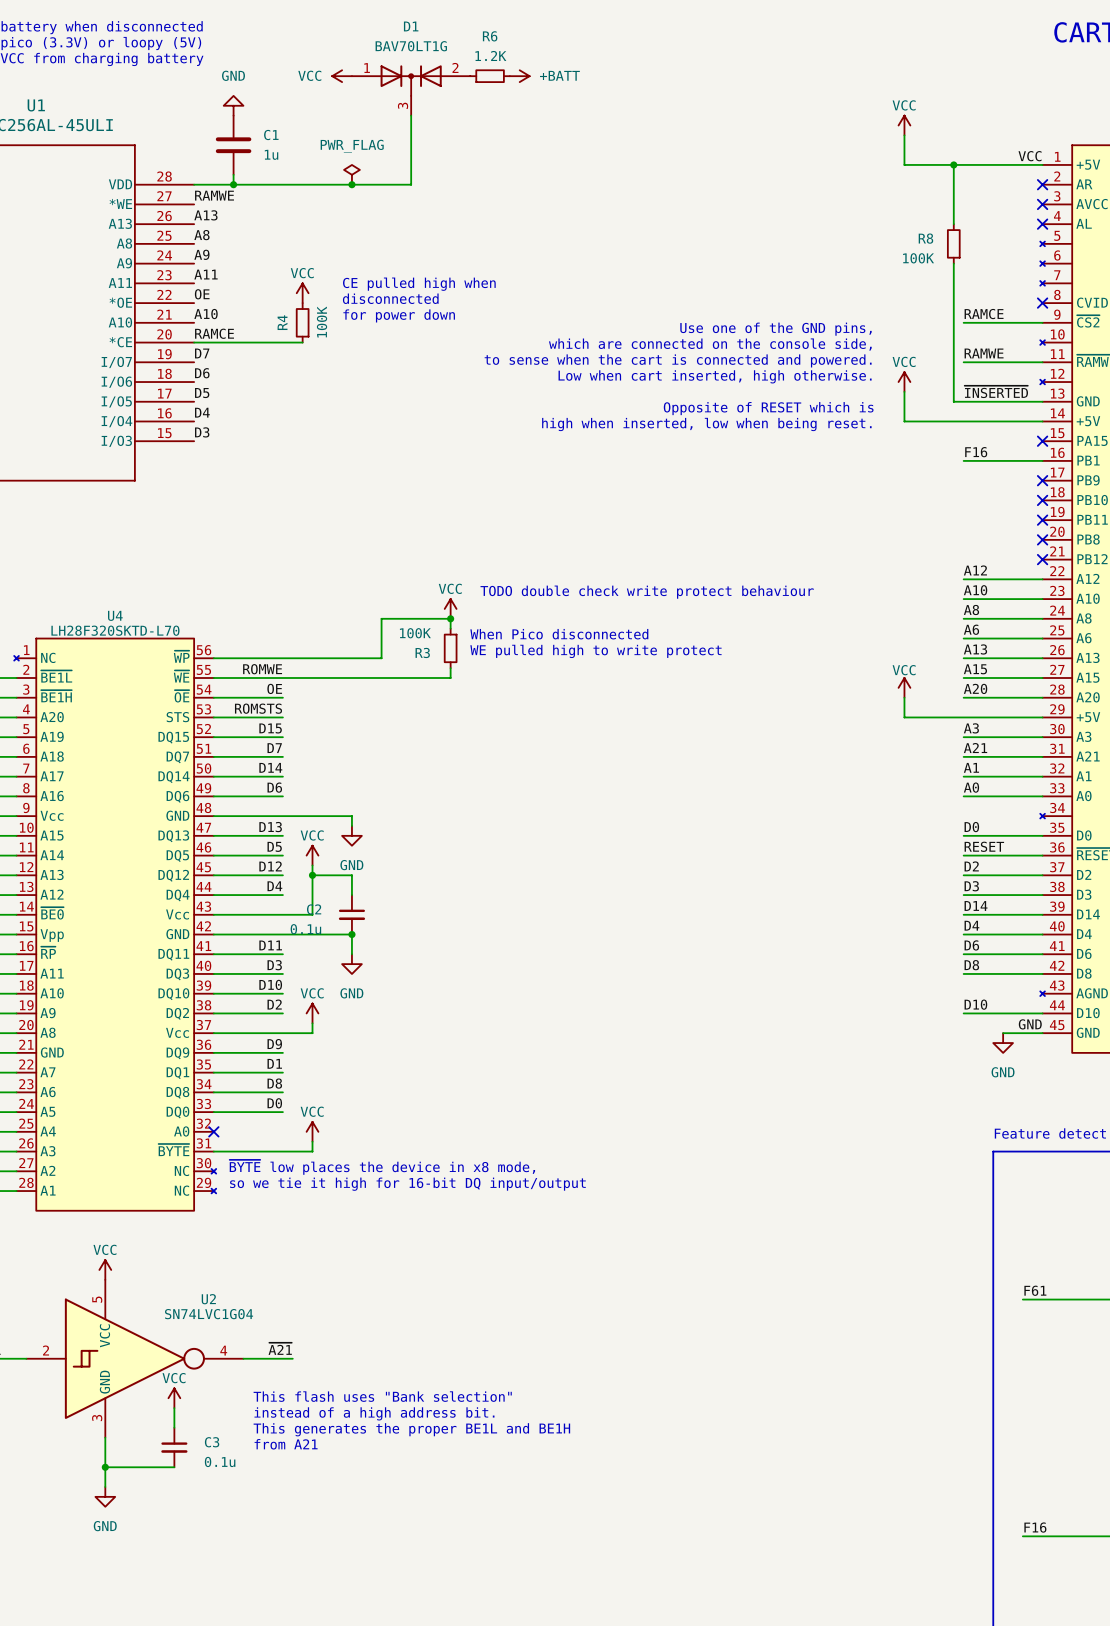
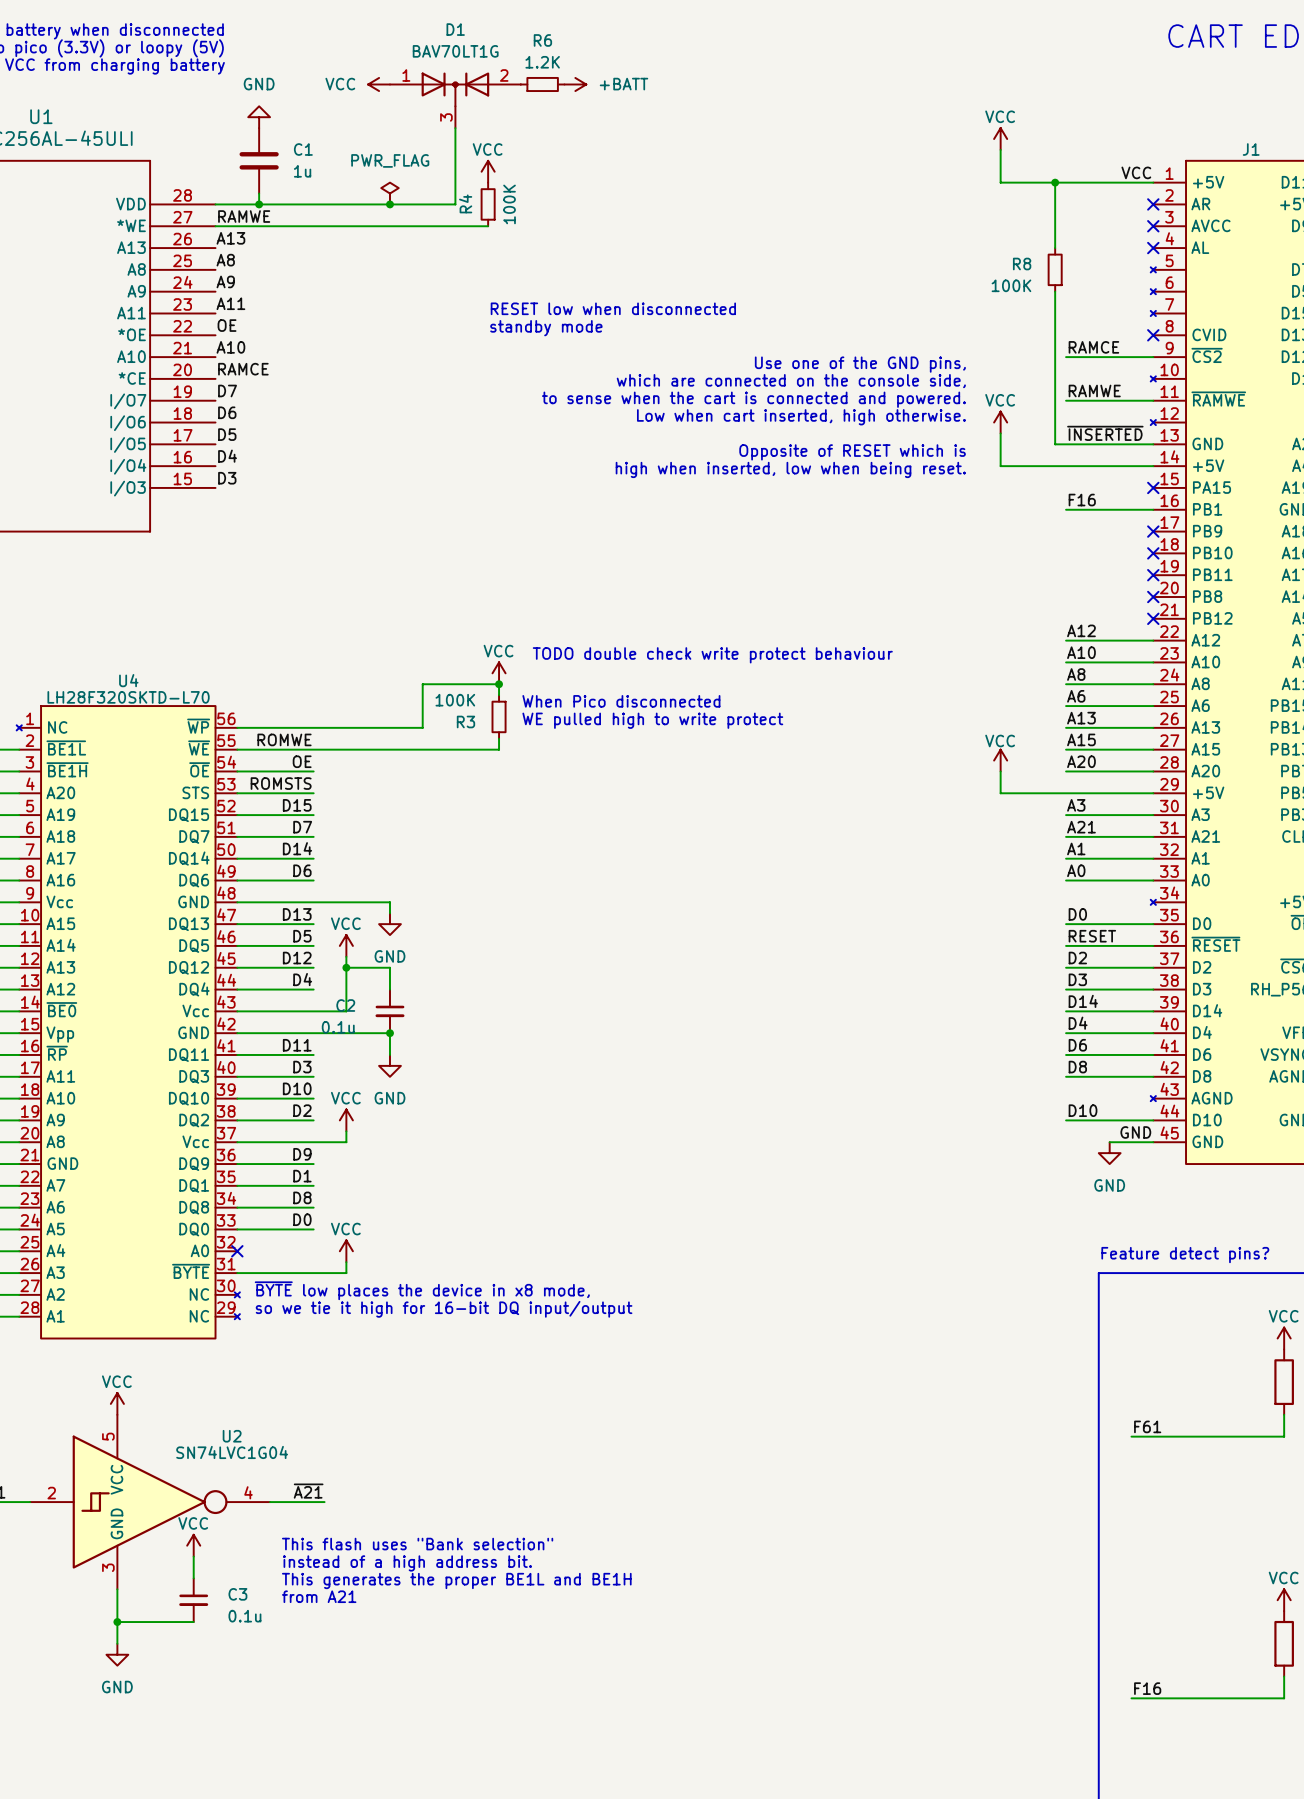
power symbol: none -> VCC (488, 171)
wire: none -> (215, 226) (488, 226)
text: CE pulled high when (419, 284) -> none
power symbol: VCC (302, 293) -> none
text: none -> standby mode (546, 328)
text: disconnected (390, 298) -> RESET low when disconnected (613, 308)
text: for power down (399, 315) -> none
R4 position: (302, 322) -> (488, 204)
wire: (194, 342) (302, 342) -> none

